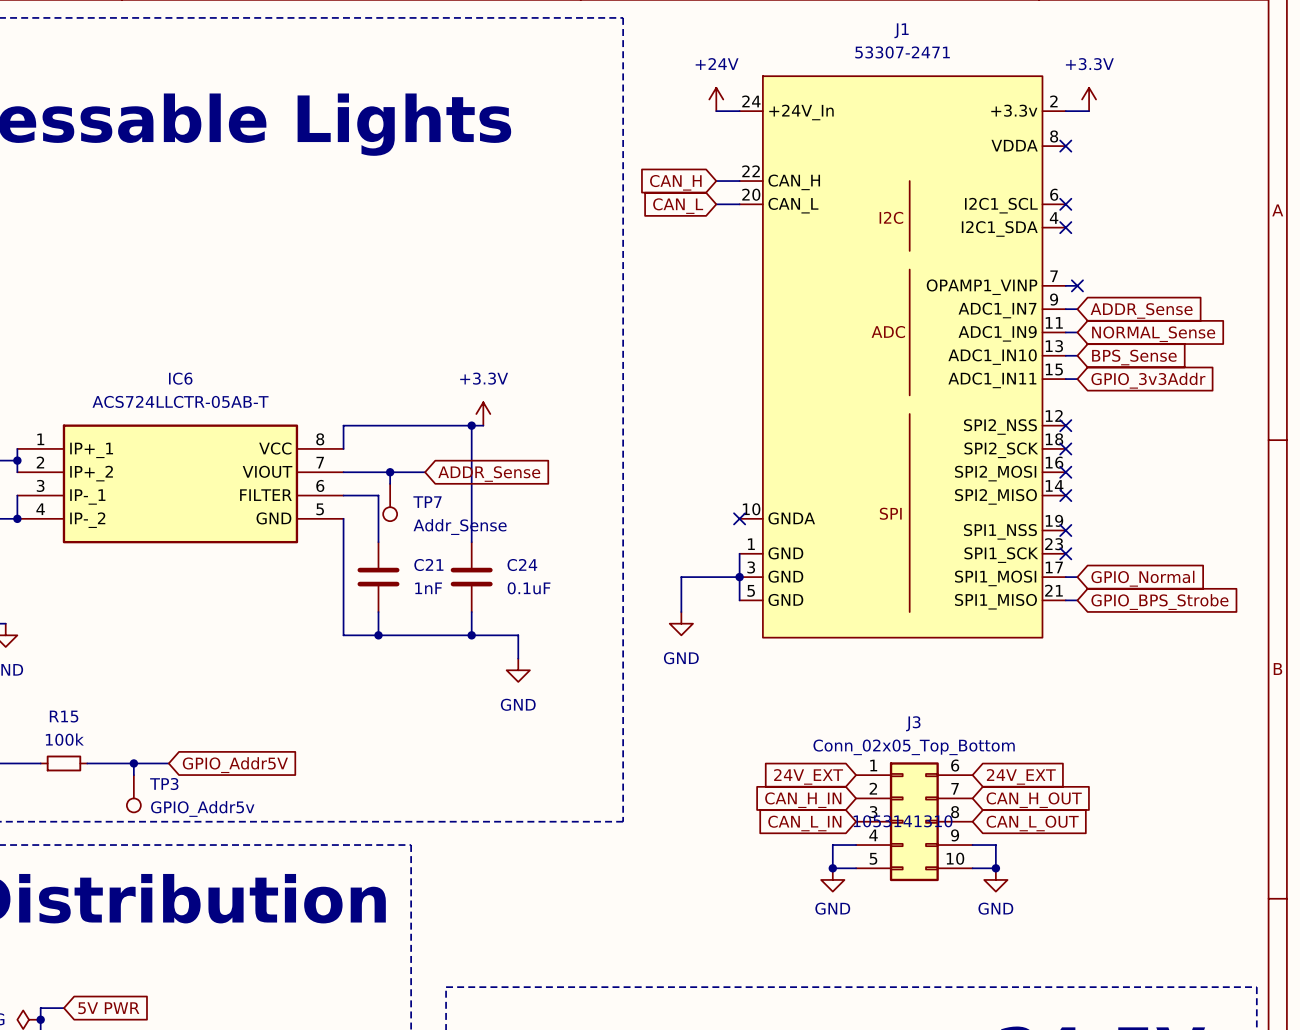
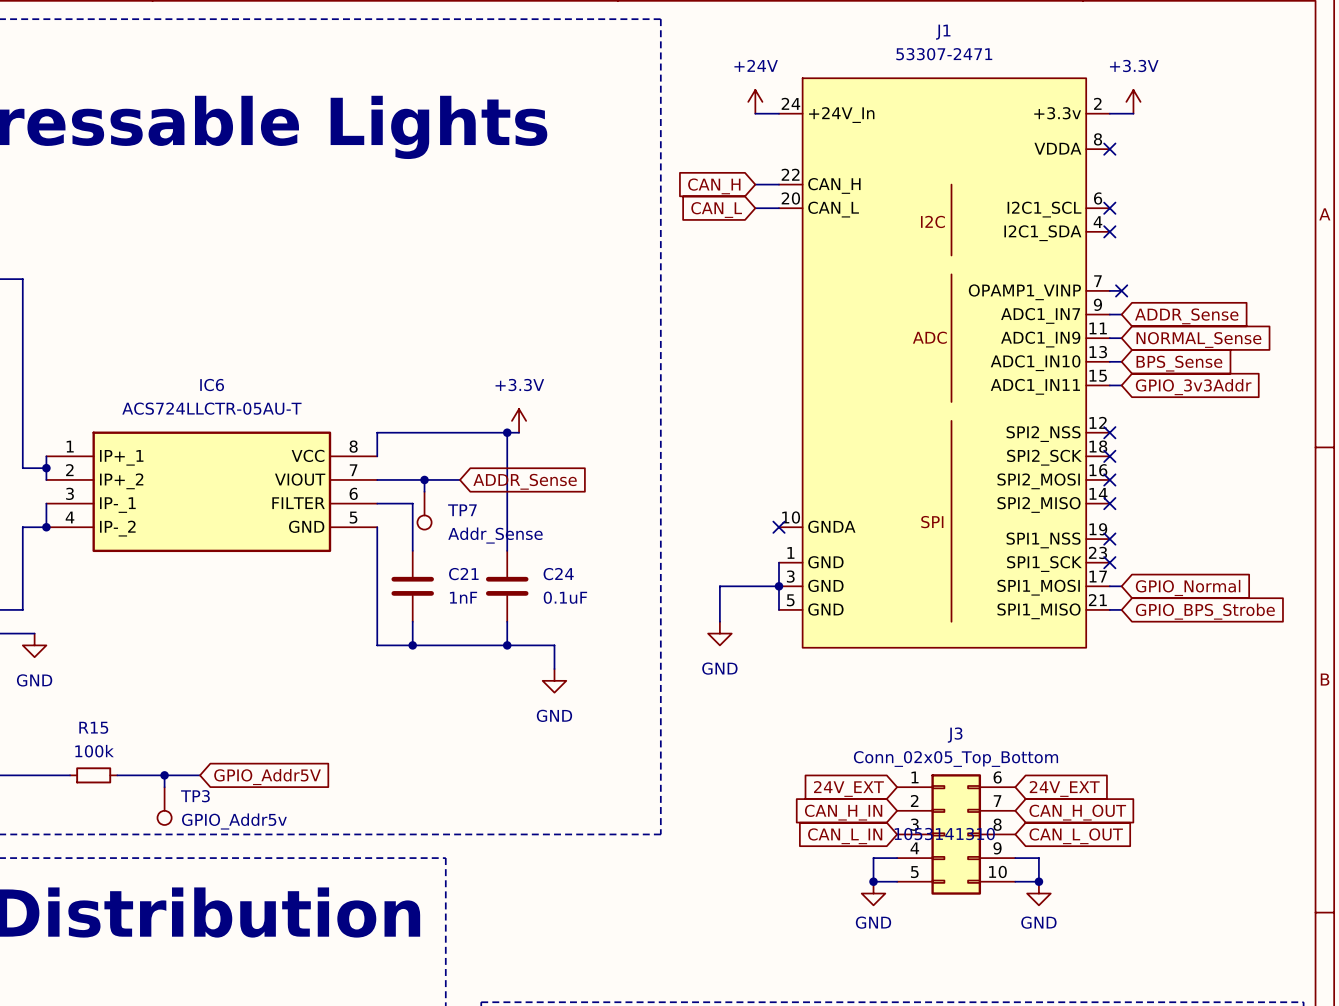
IC6 value: ACS724LLCTR-05AB-T (180, 401) -> ACS724LLCTR-05AU-T (211, 408)

